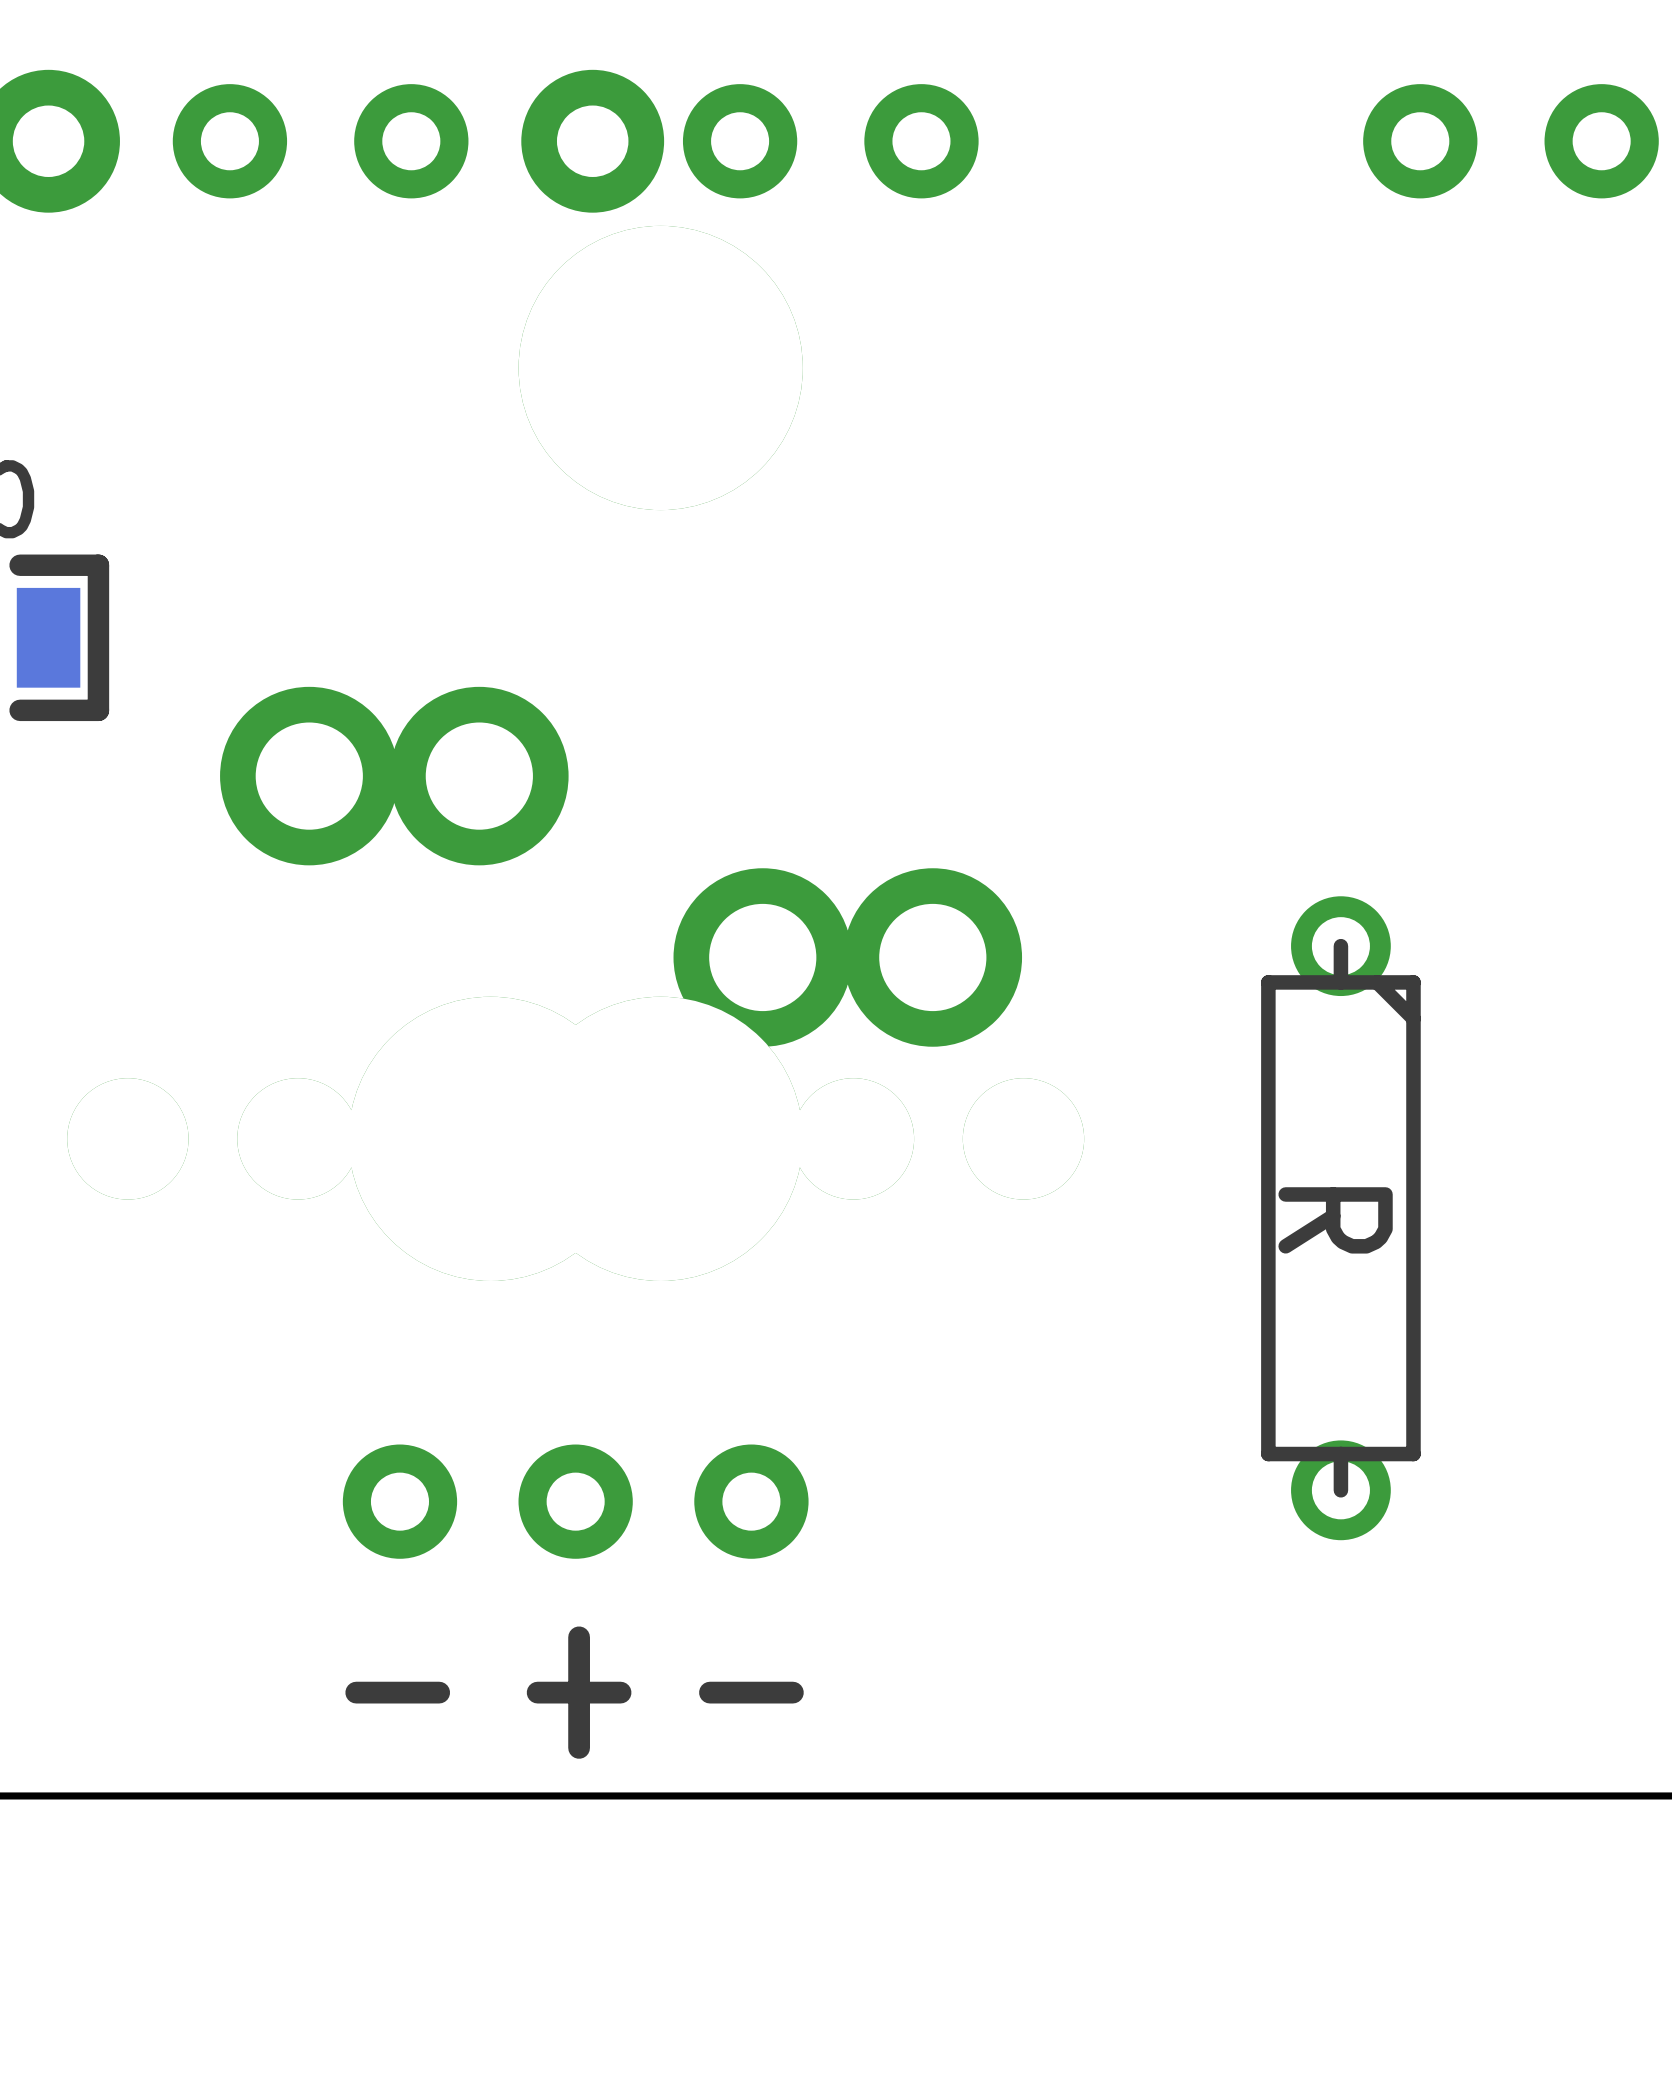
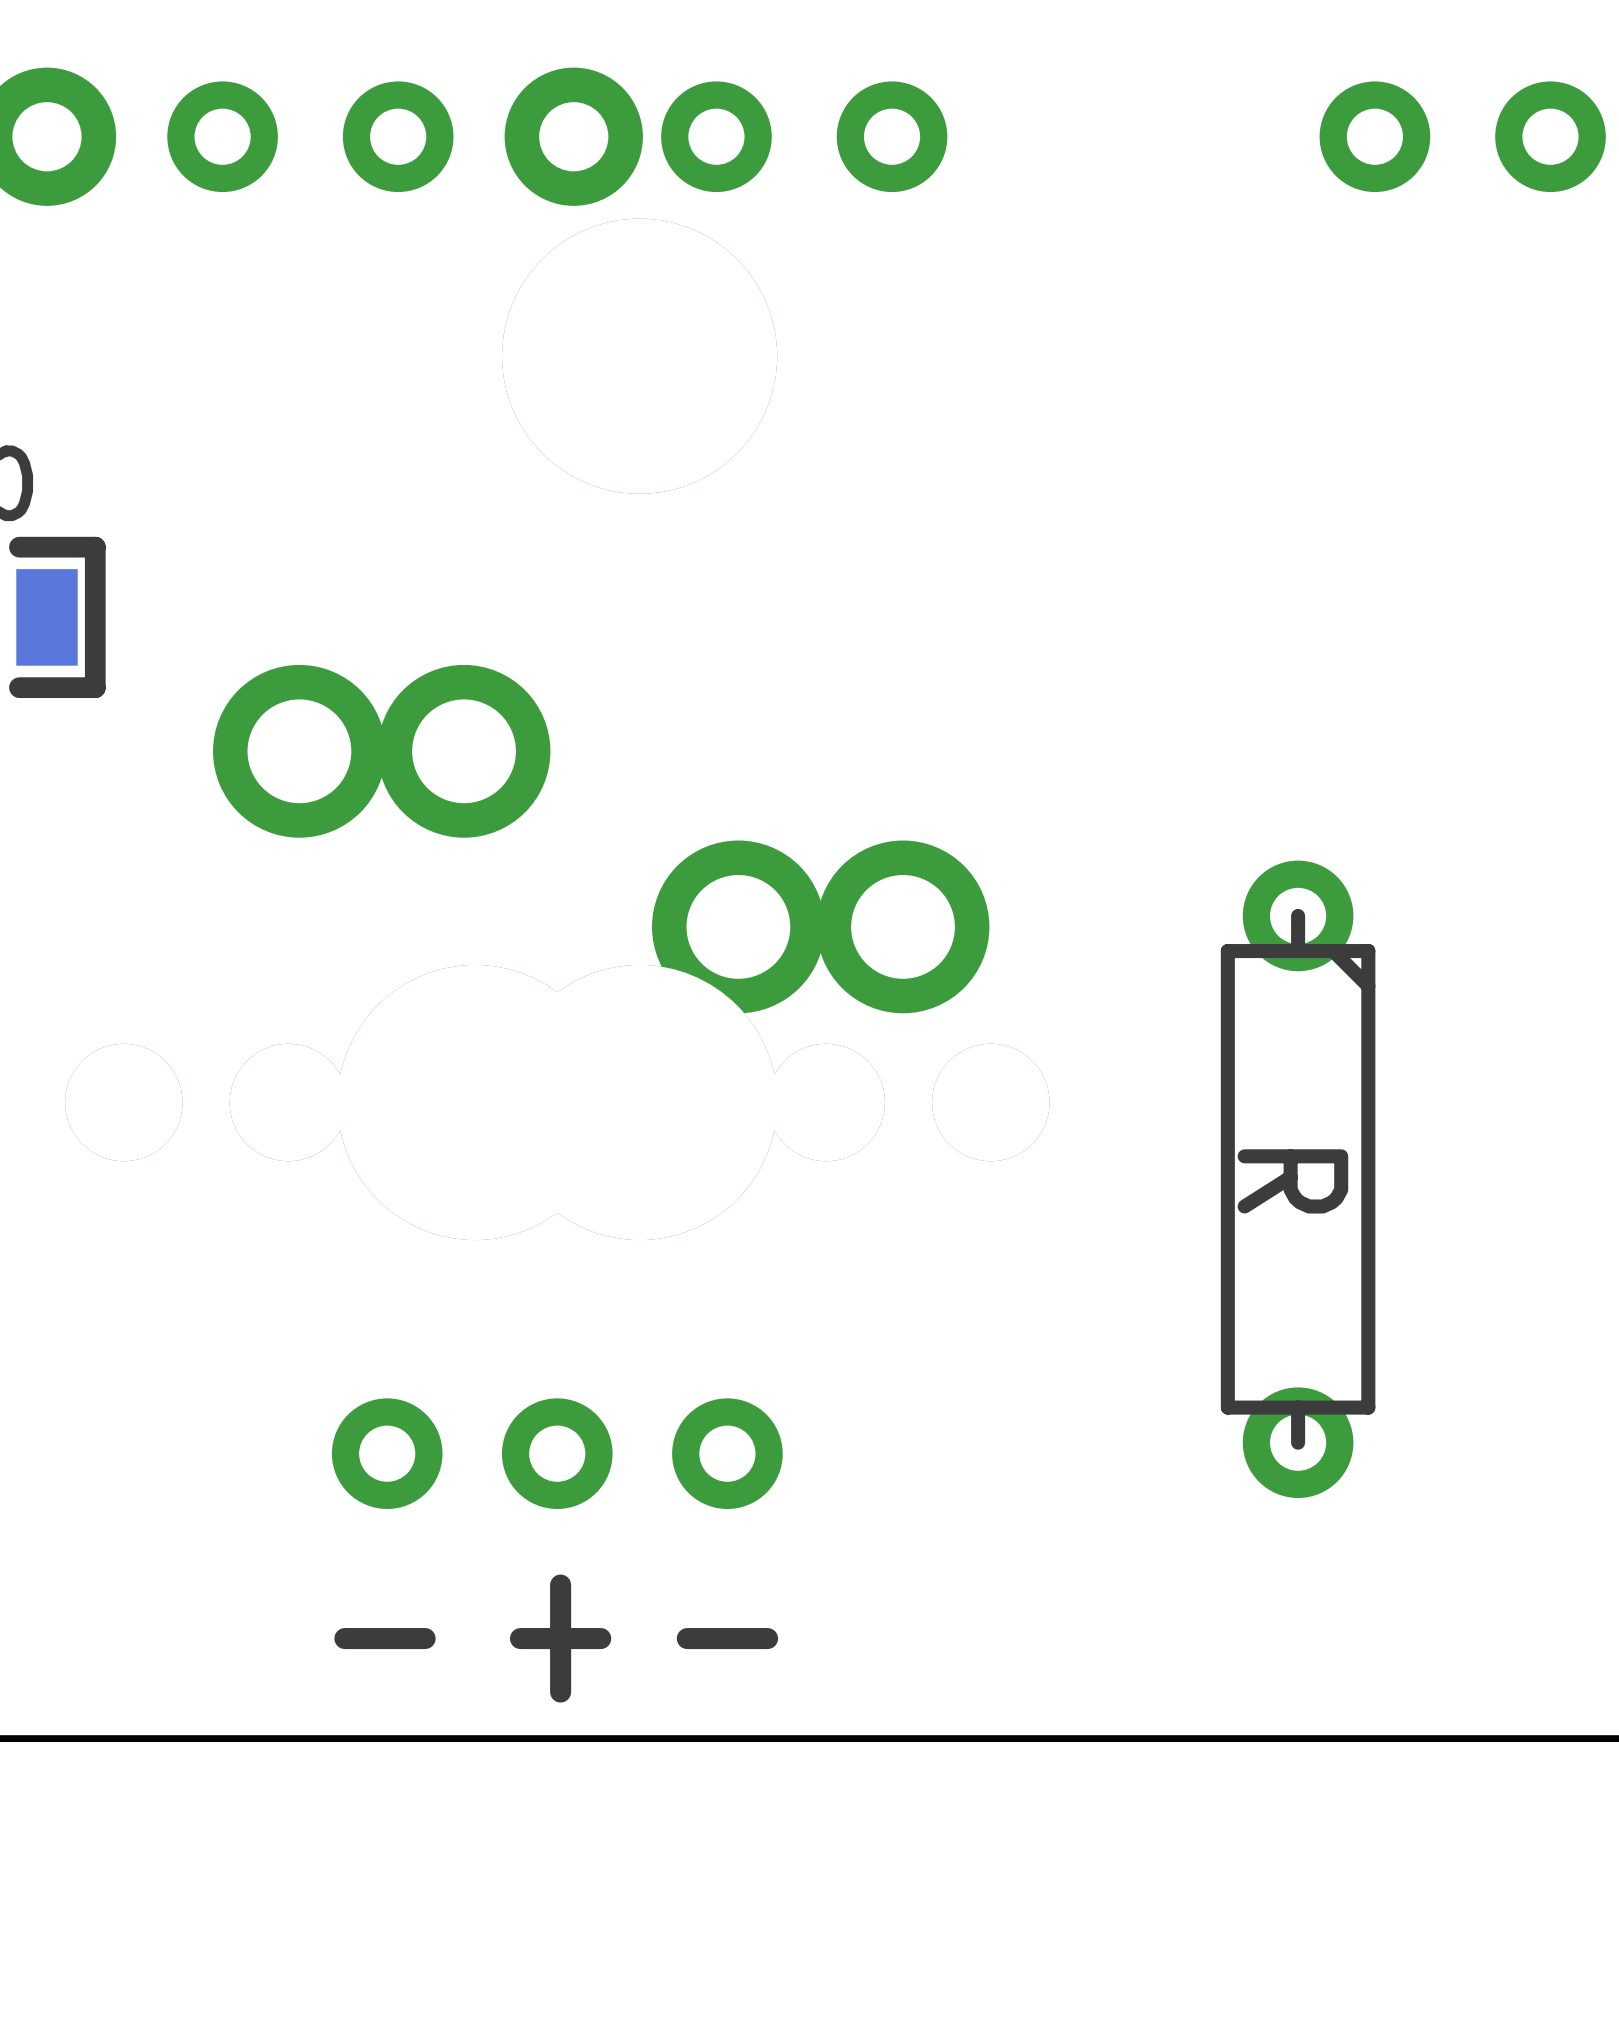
part footprint: [1261, 896, 1421, 1541] -> [1220, 860, 1376, 1499]

